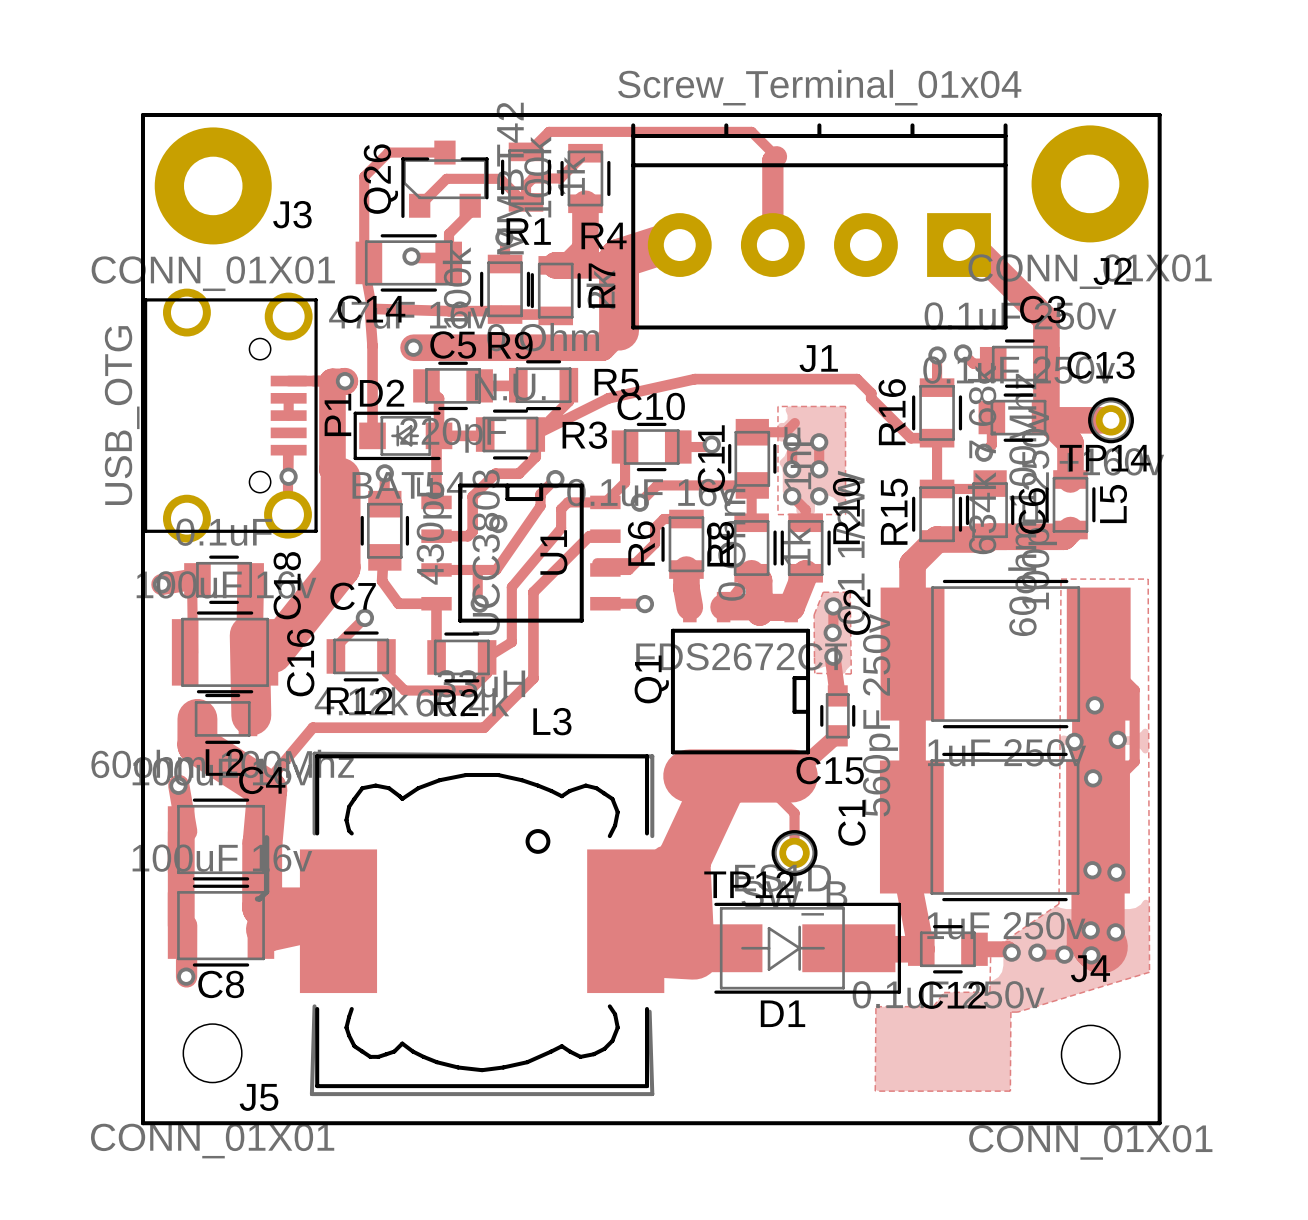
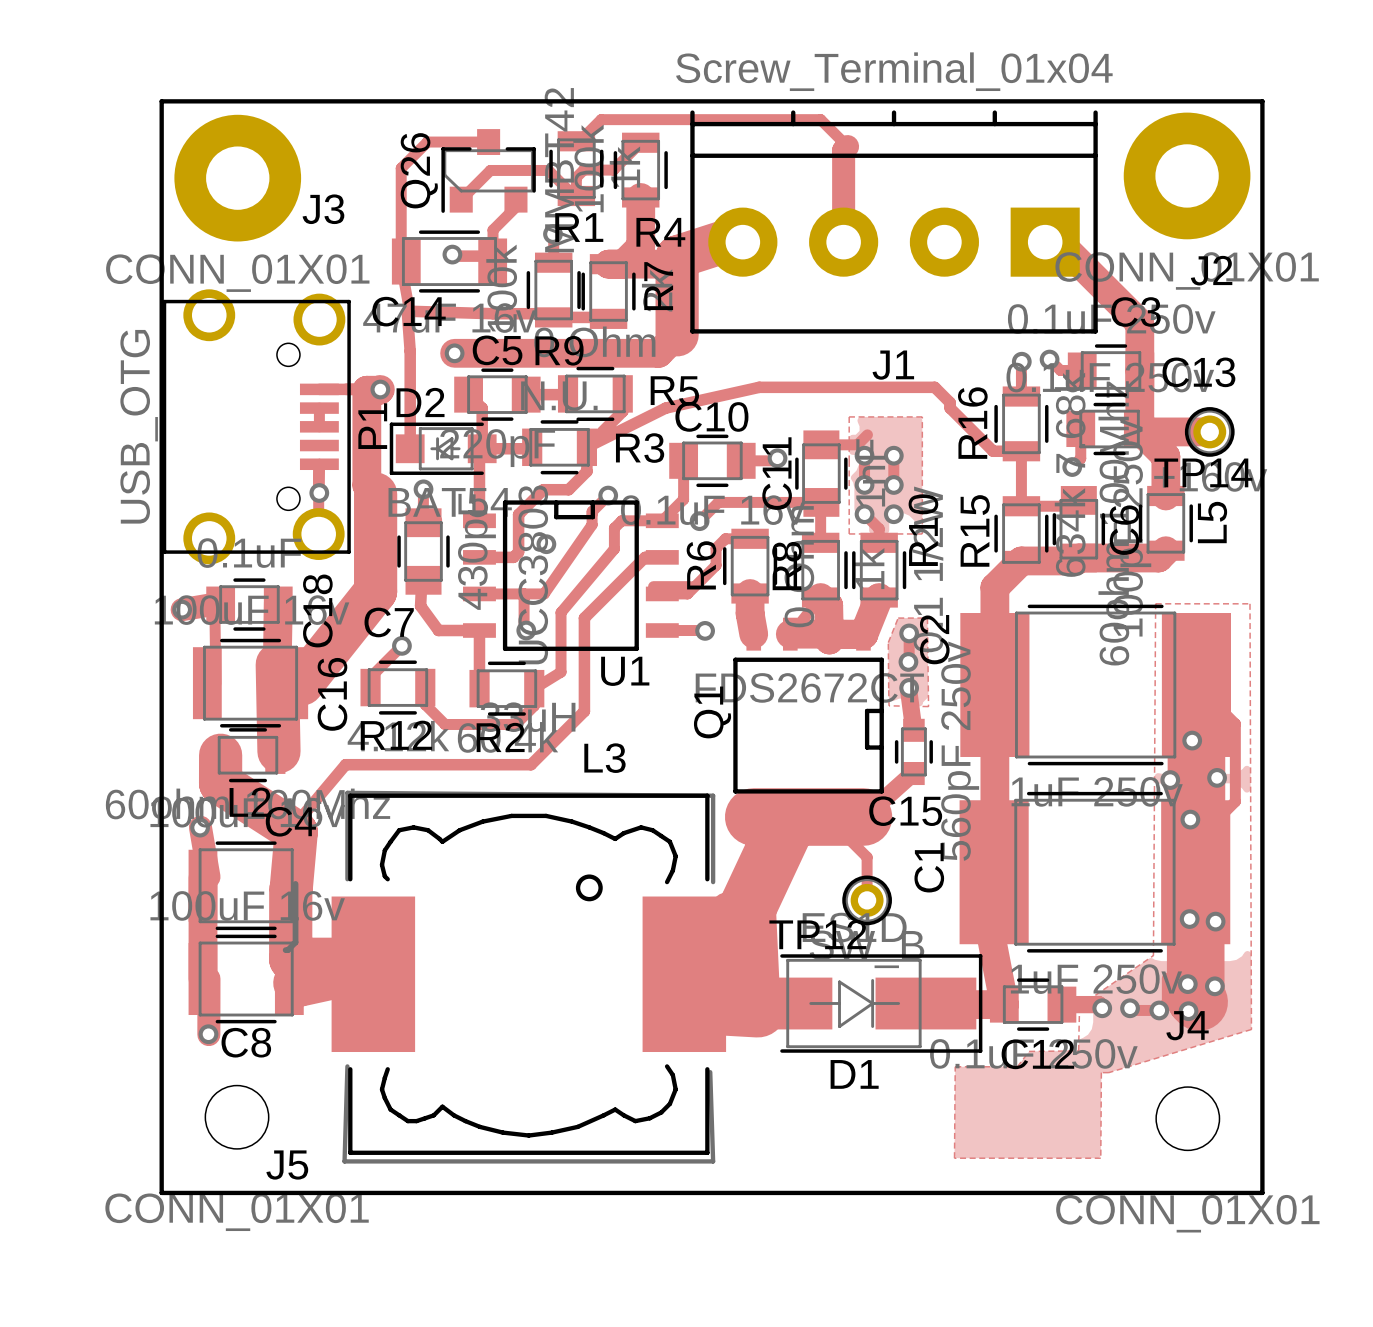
U1 name rotation: 0° (553, 552) -> 90° clockwise (625, 671)
U1 name position: U1 (553, 552) -> U1 (625, 671)

